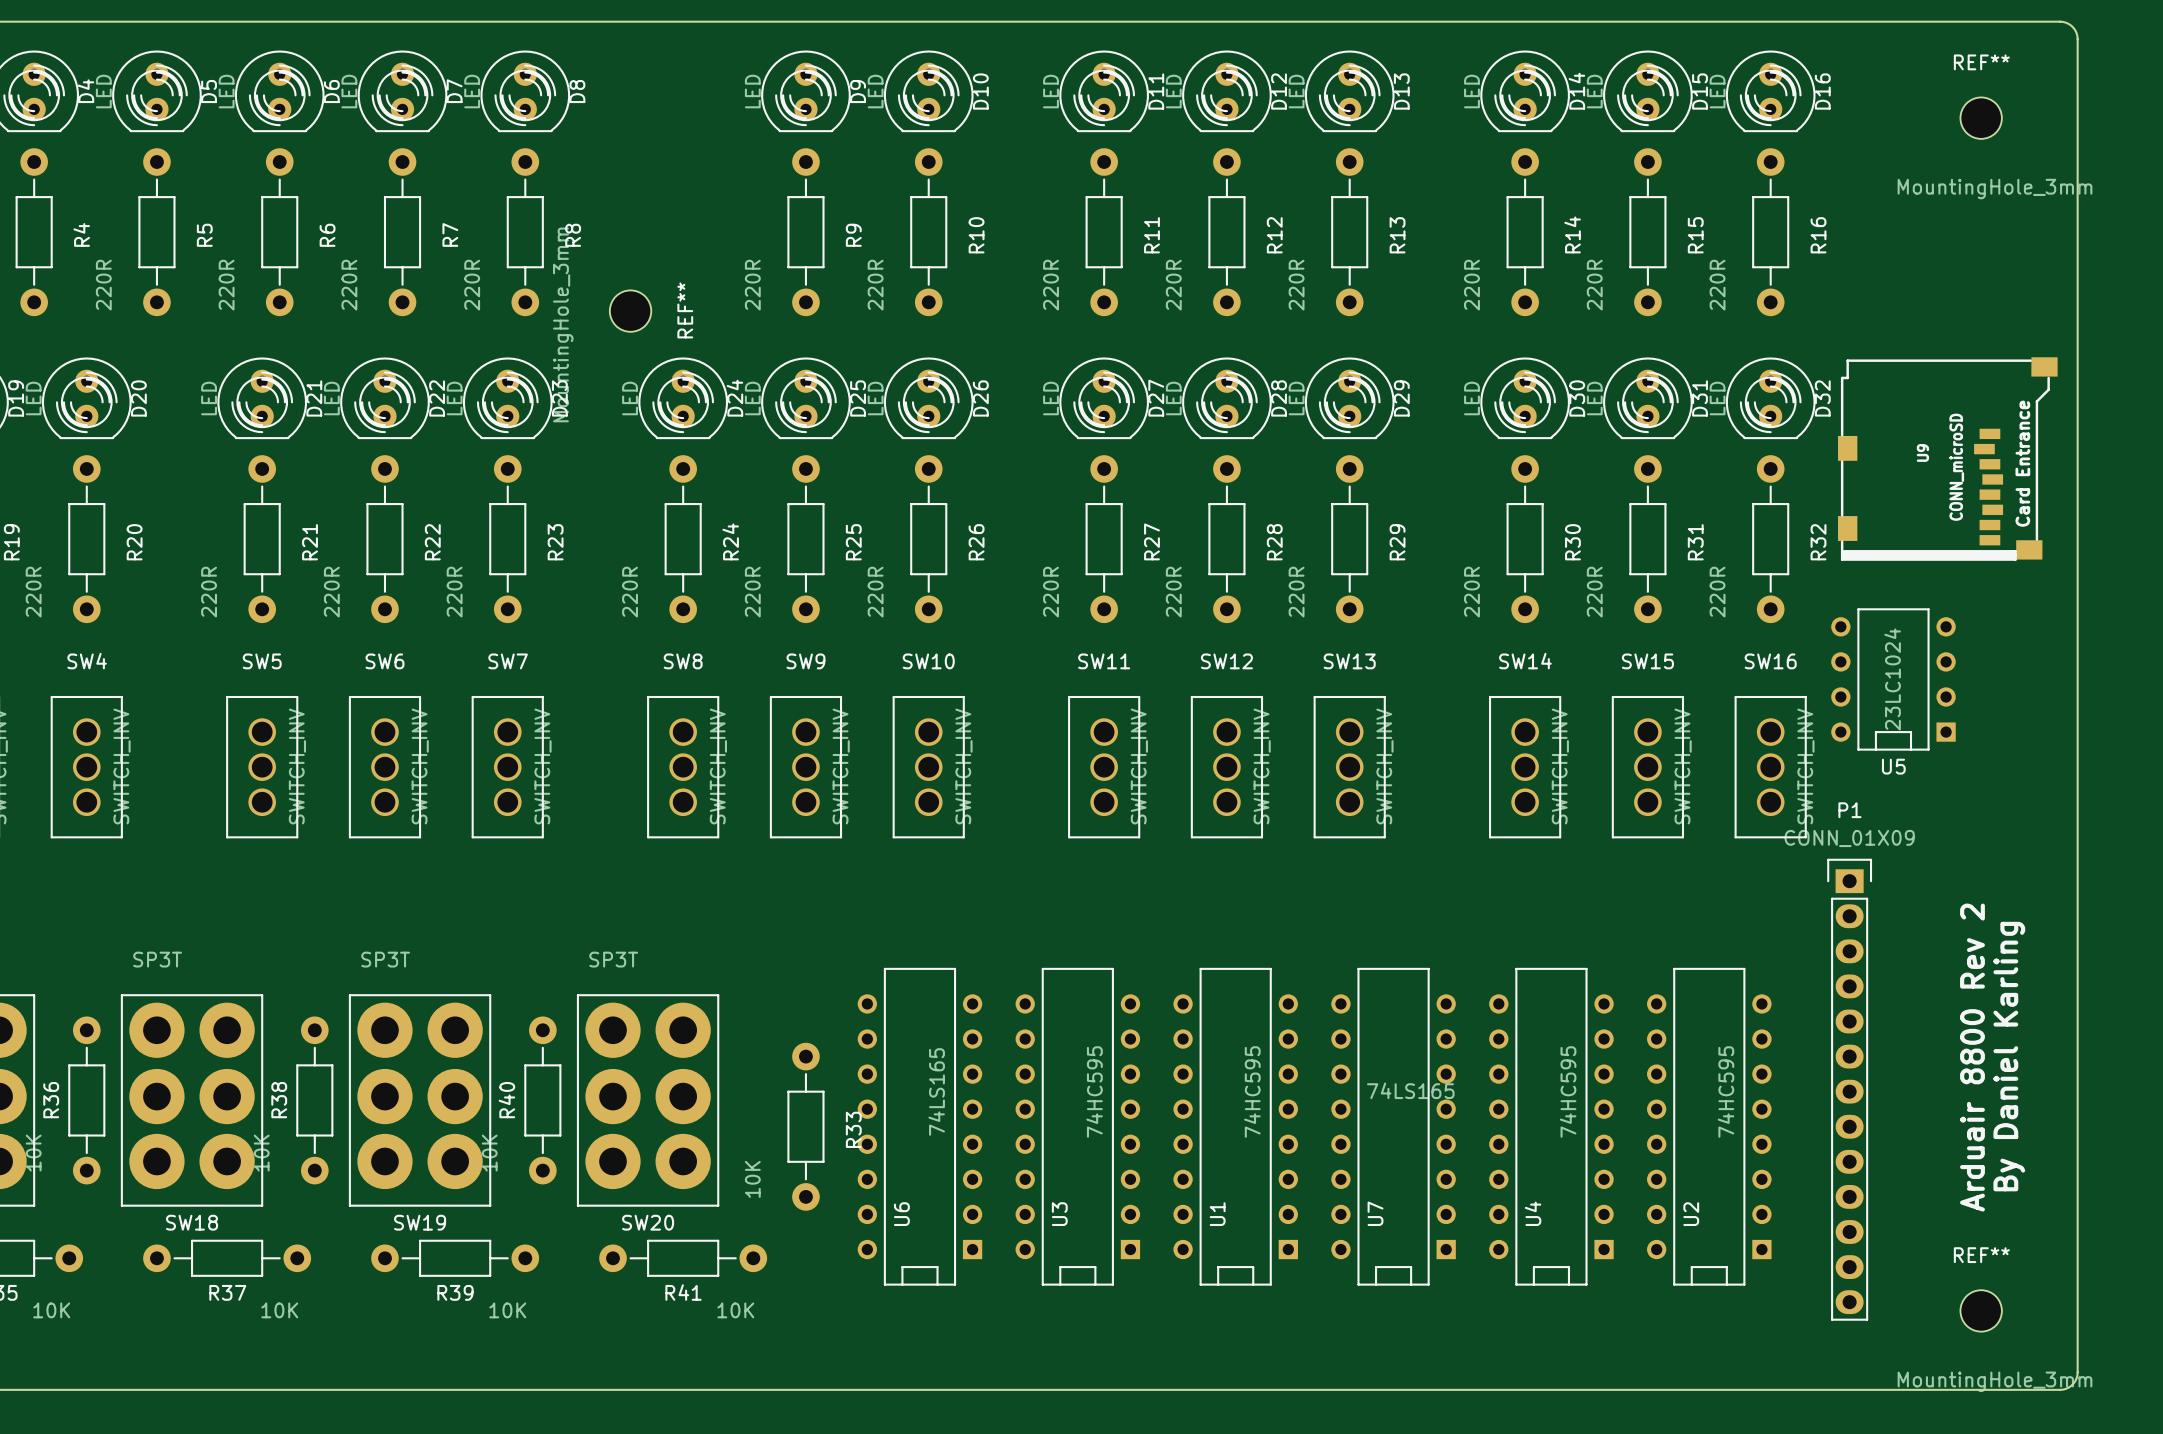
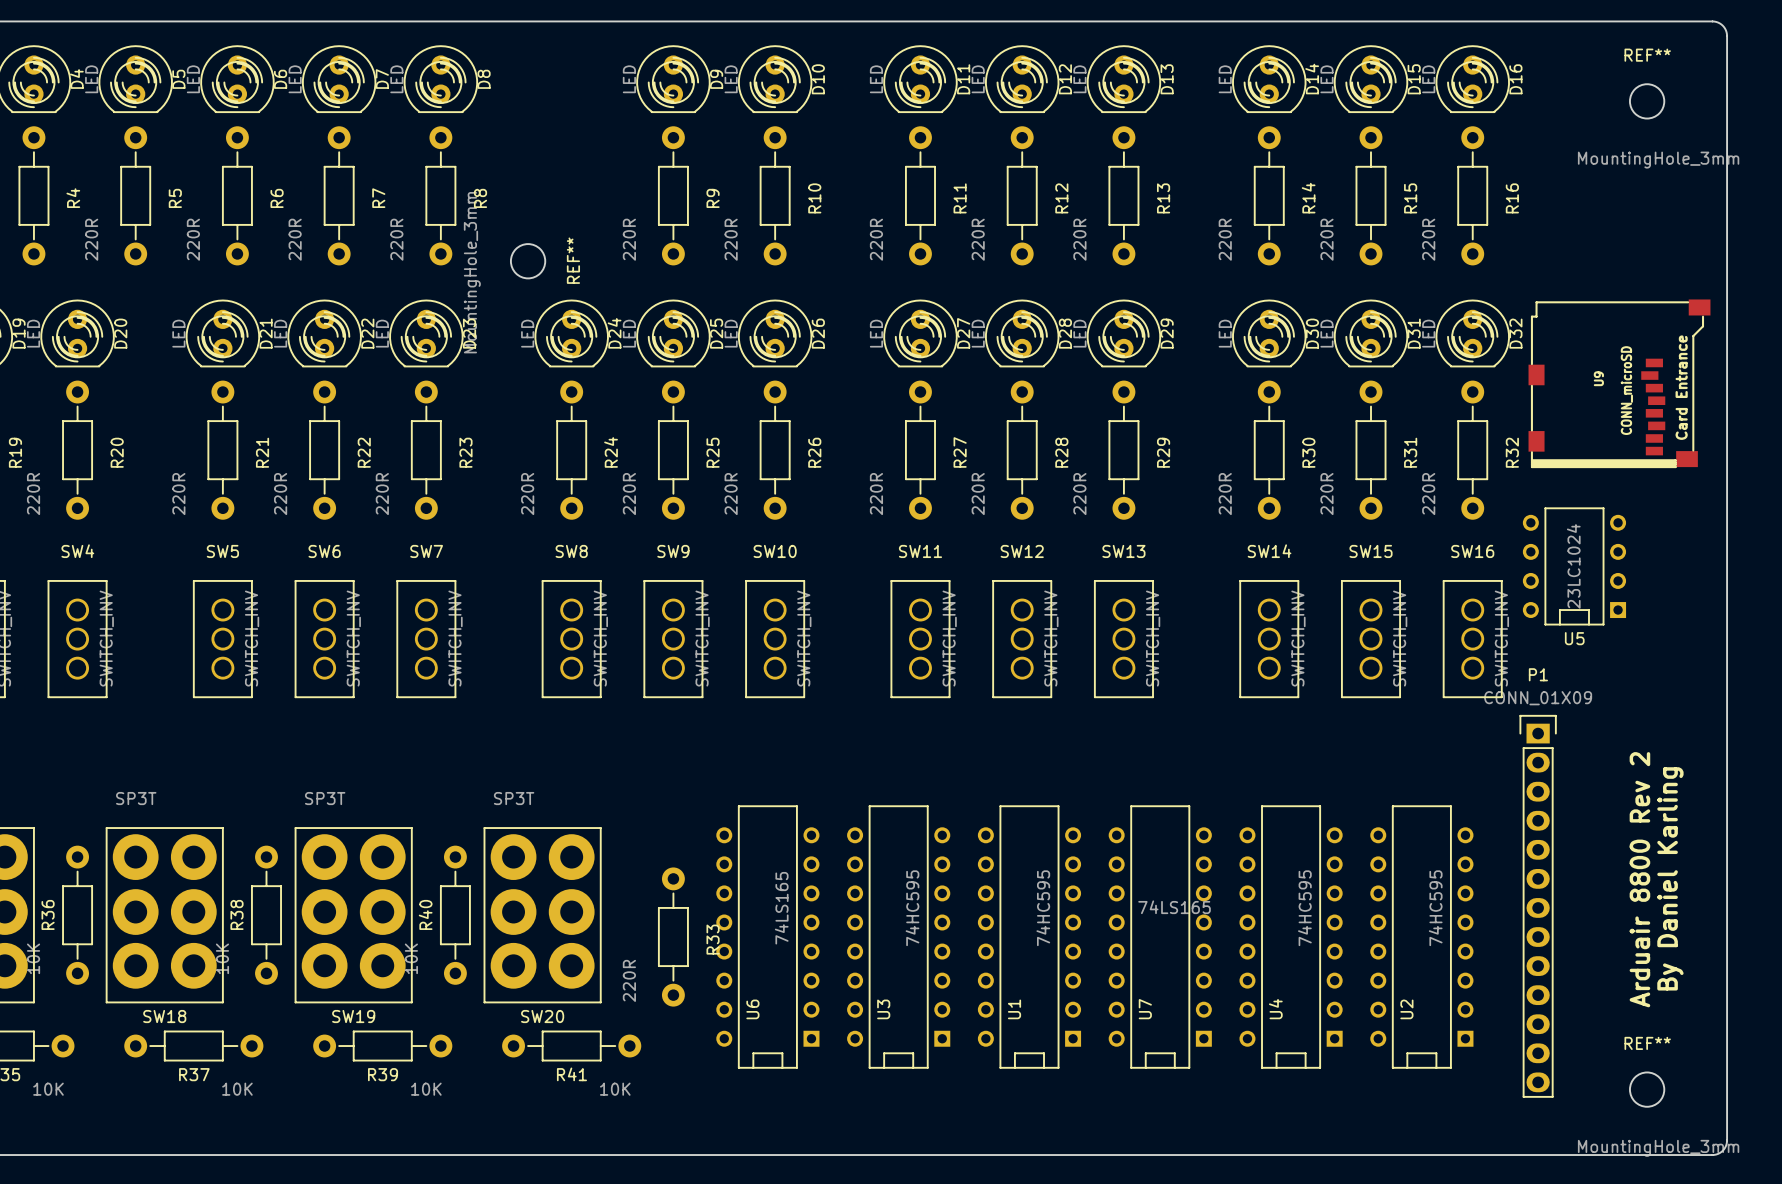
R33 value: 10K (752, 1179) -> 220R (629, 980)

